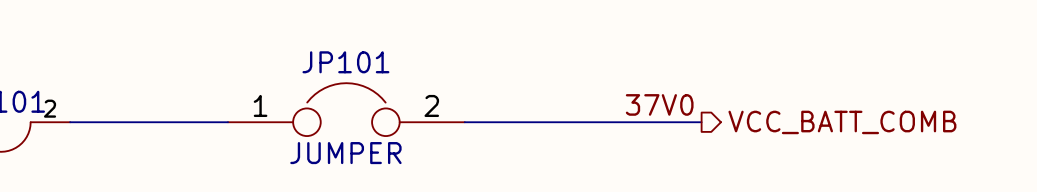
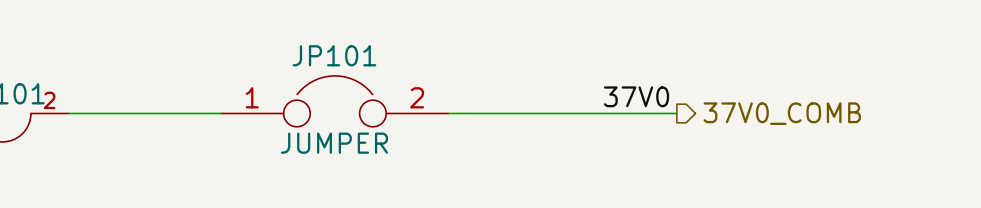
hierarchical label: VCC_BATT_COMB (842, 122) -> 37V0_COMB (782, 113)

